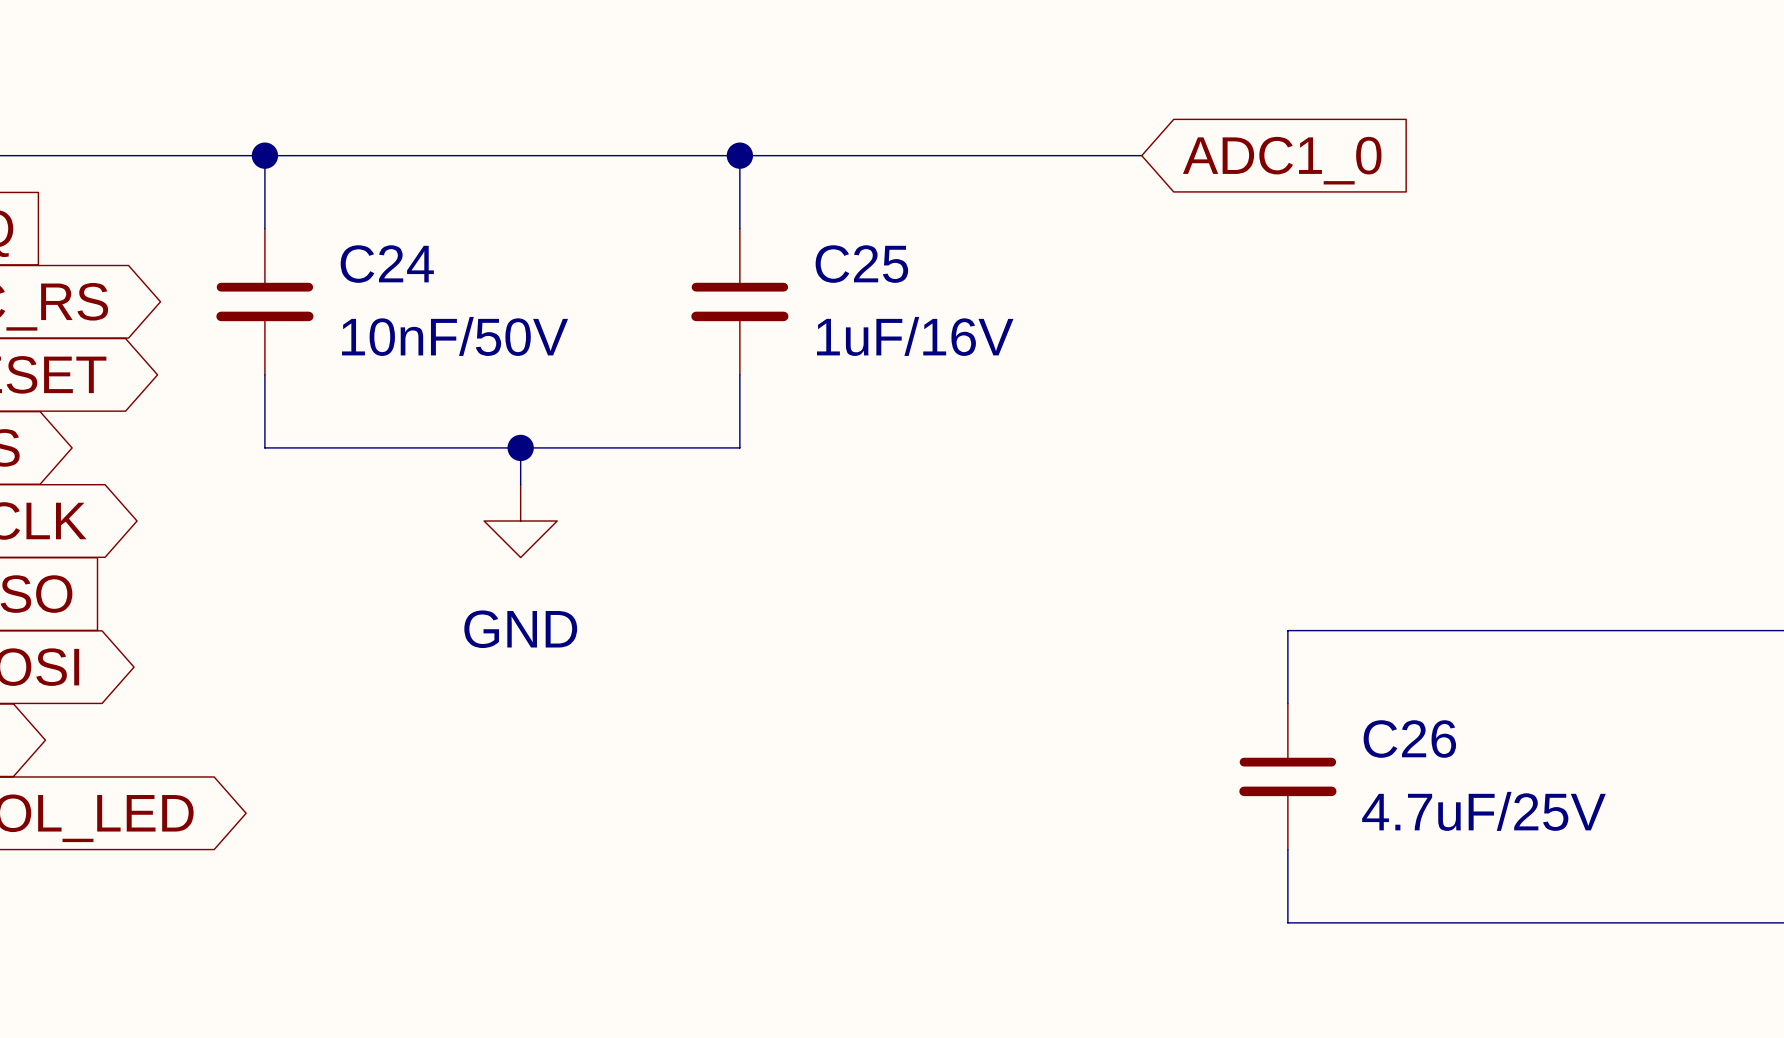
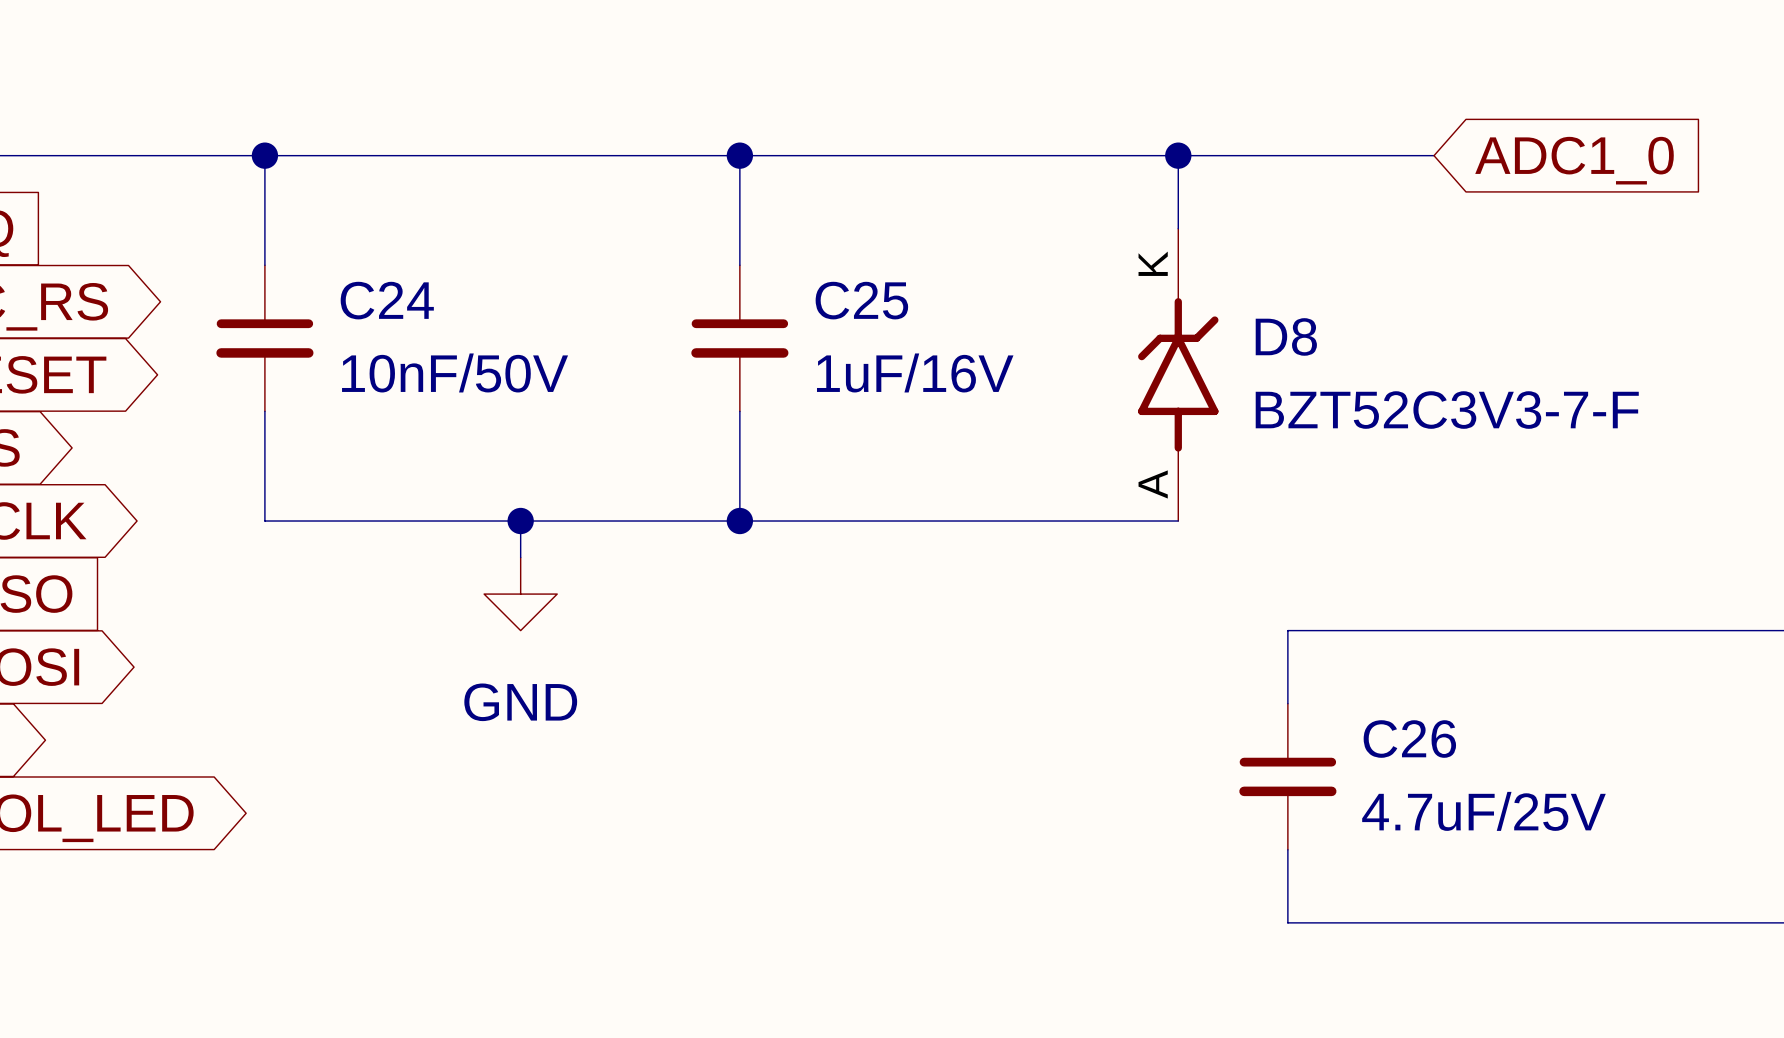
wire: none -> (1141, 155) (1434, 155)
wire: none -> (1178, 155) (1178, 228)
junction: none -> (1178, 155)
global label position: ADC1_0 (1282, 160) -> ADC1_0 (1574, 160)
C24 position: (264, 301) -> (264, 338)
C25 position: (739, 301) -> (739, 338)
D8: none -> BZT52C3V3-7-F (1178, 374)
wire: (264, 447) (739, 447) -> (264, 447) (264, 521) (1178, 521)
wire: (520, 447) (520, 484) -> (520, 521) (520, 557)
junction position: (520, 447) -> (520, 521)
wire: none -> (739, 447) (739, 521)
power symbol position: GND (520, 521) -> GND (520, 594)
junction: none -> (739, 521)

